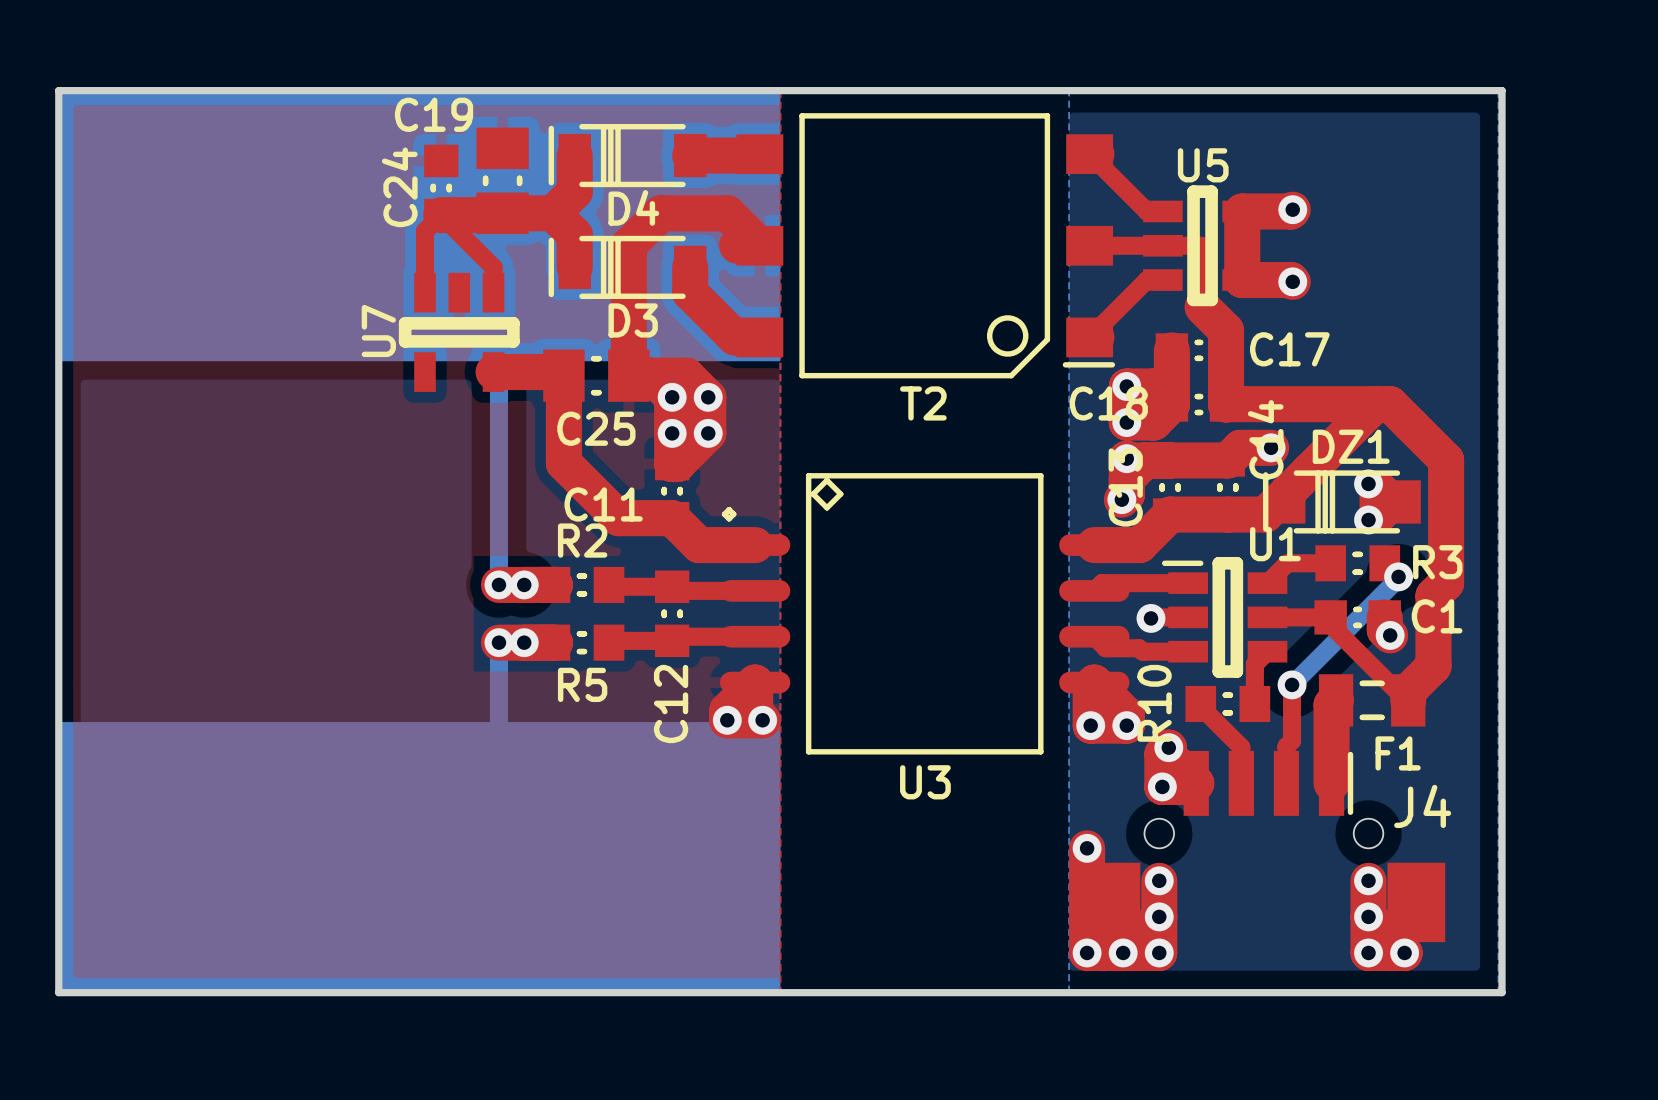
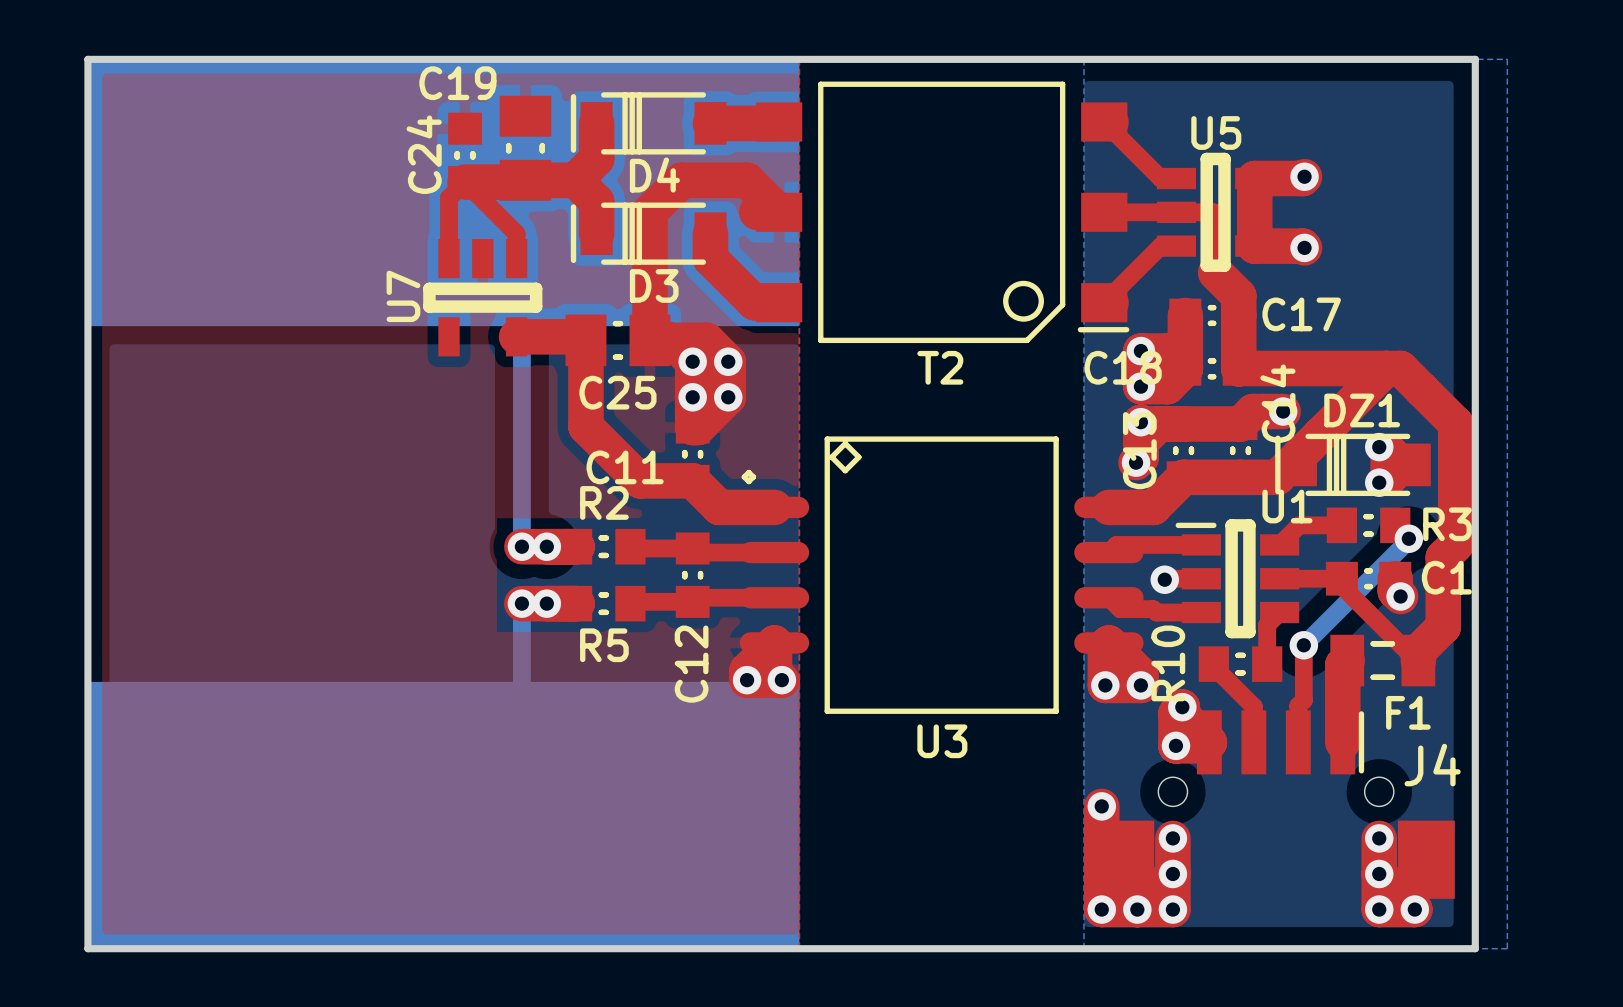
board edge: (1465, 90) (1502, 90) (1502, 992) (1465, 992) -> (1475, 59) (1475, 948)

